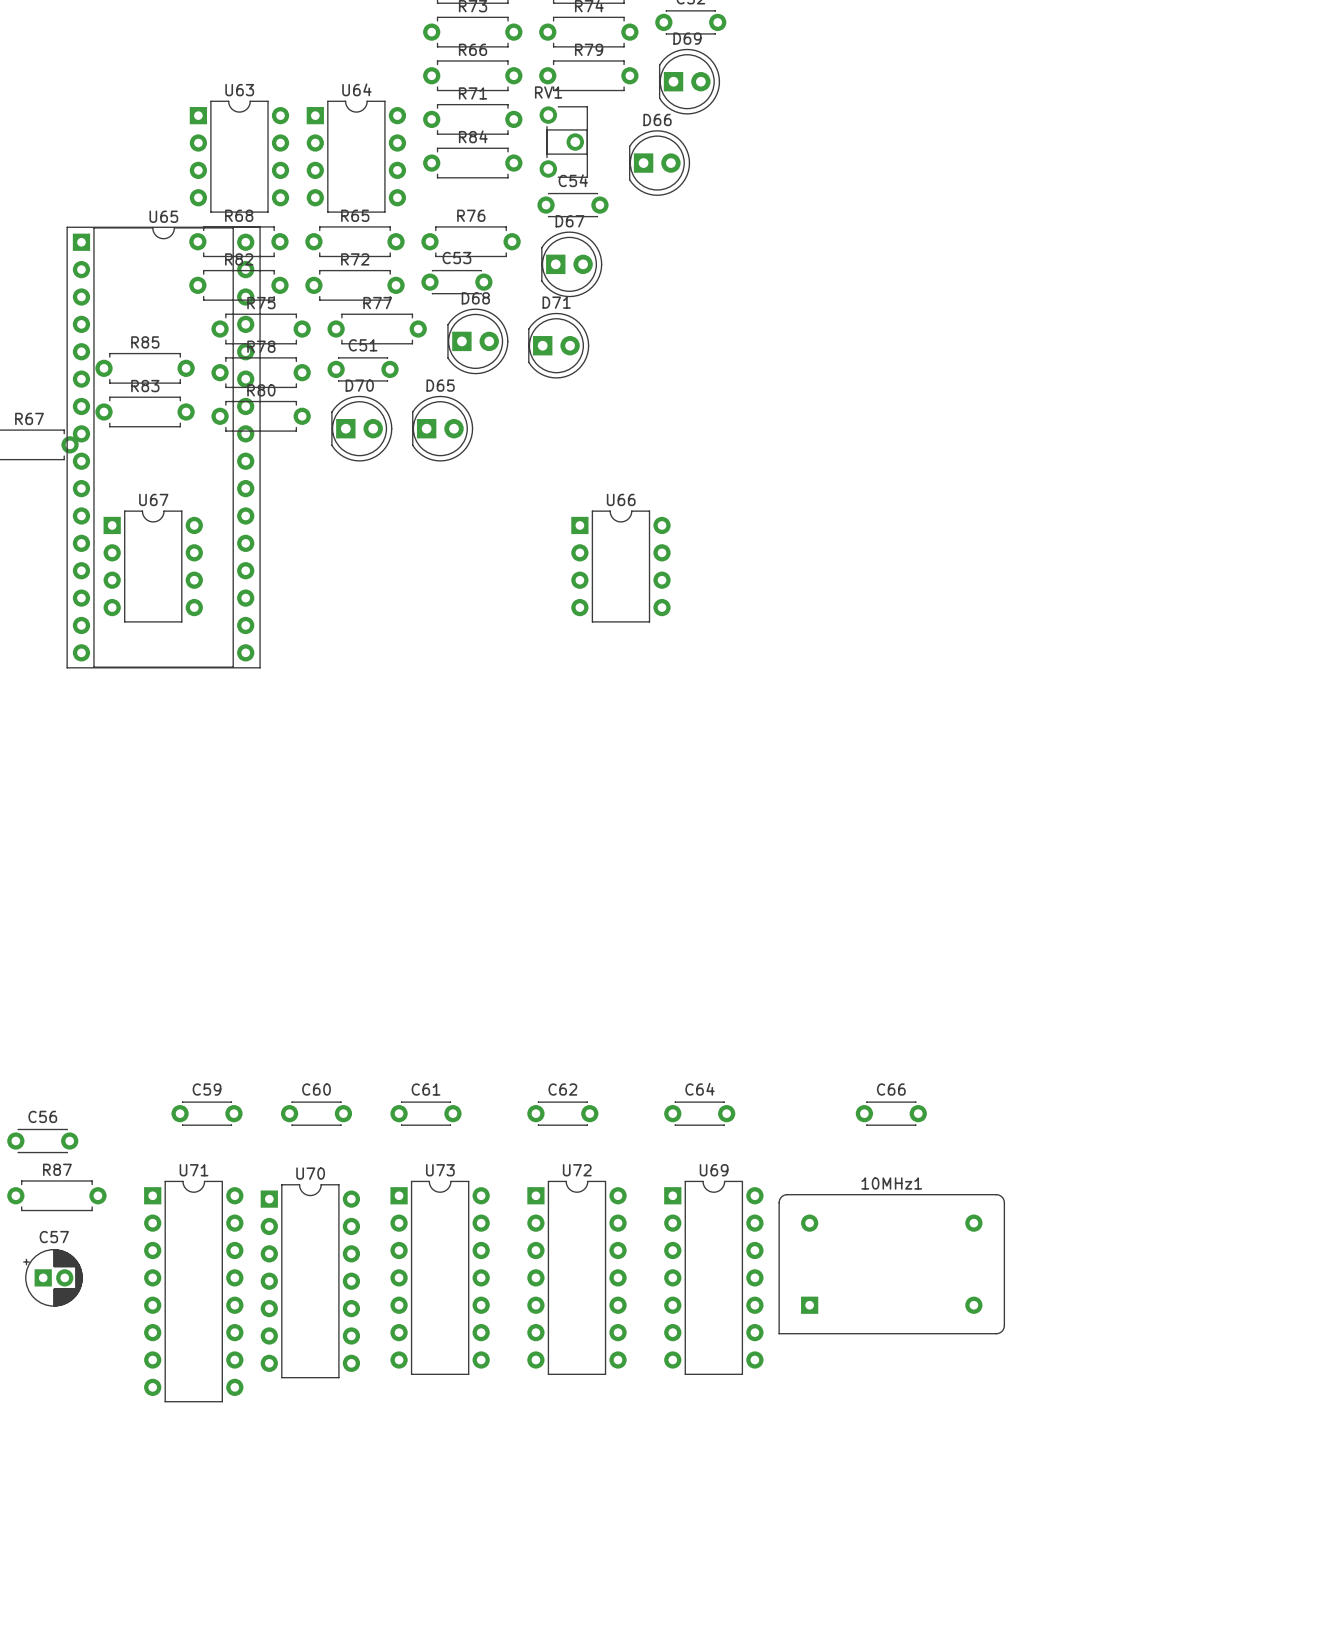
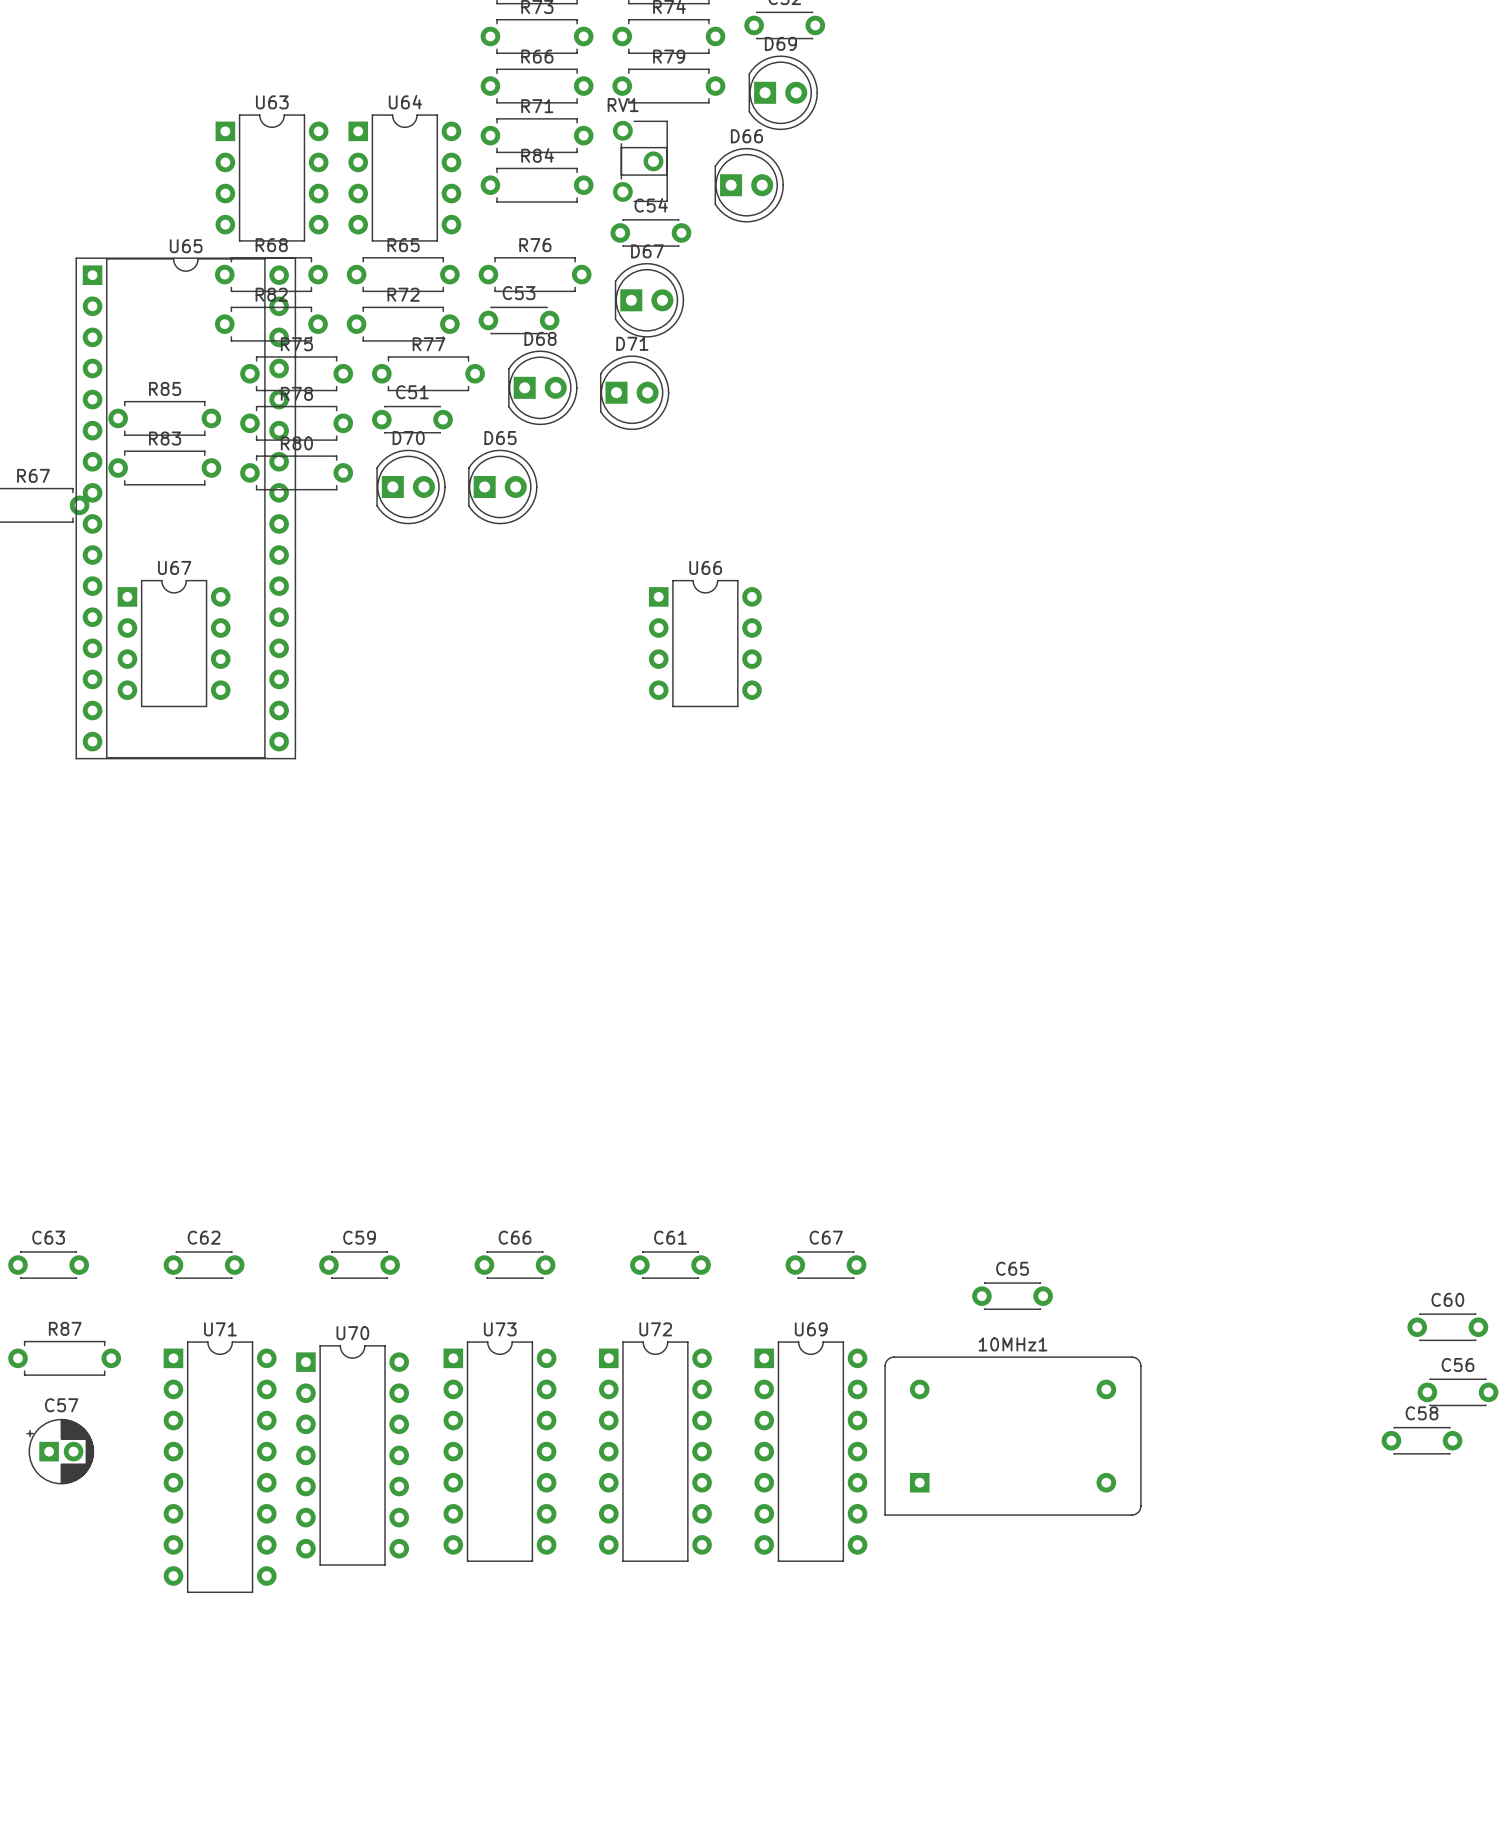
C60 name: C60 (316, 1089) -> C59 (359, 1237)
C63: none -> (48, 1265)
C59: (207, 1113) -> none
C61 position: (426, 1113) -> (670, 1265)
C62 position: (562, 1113) -> (204, 1265)
C64: (699, 1113) -> none
C67: none -> (825, 1265)
C66 position: (891, 1113) -> (515, 1265)
C56 position: (42, 1141) -> (1458, 1392)
C65: none -> (1012, 1296)
C60: none -> (1447, 1327)
C58: none -> (1422, 1440)

